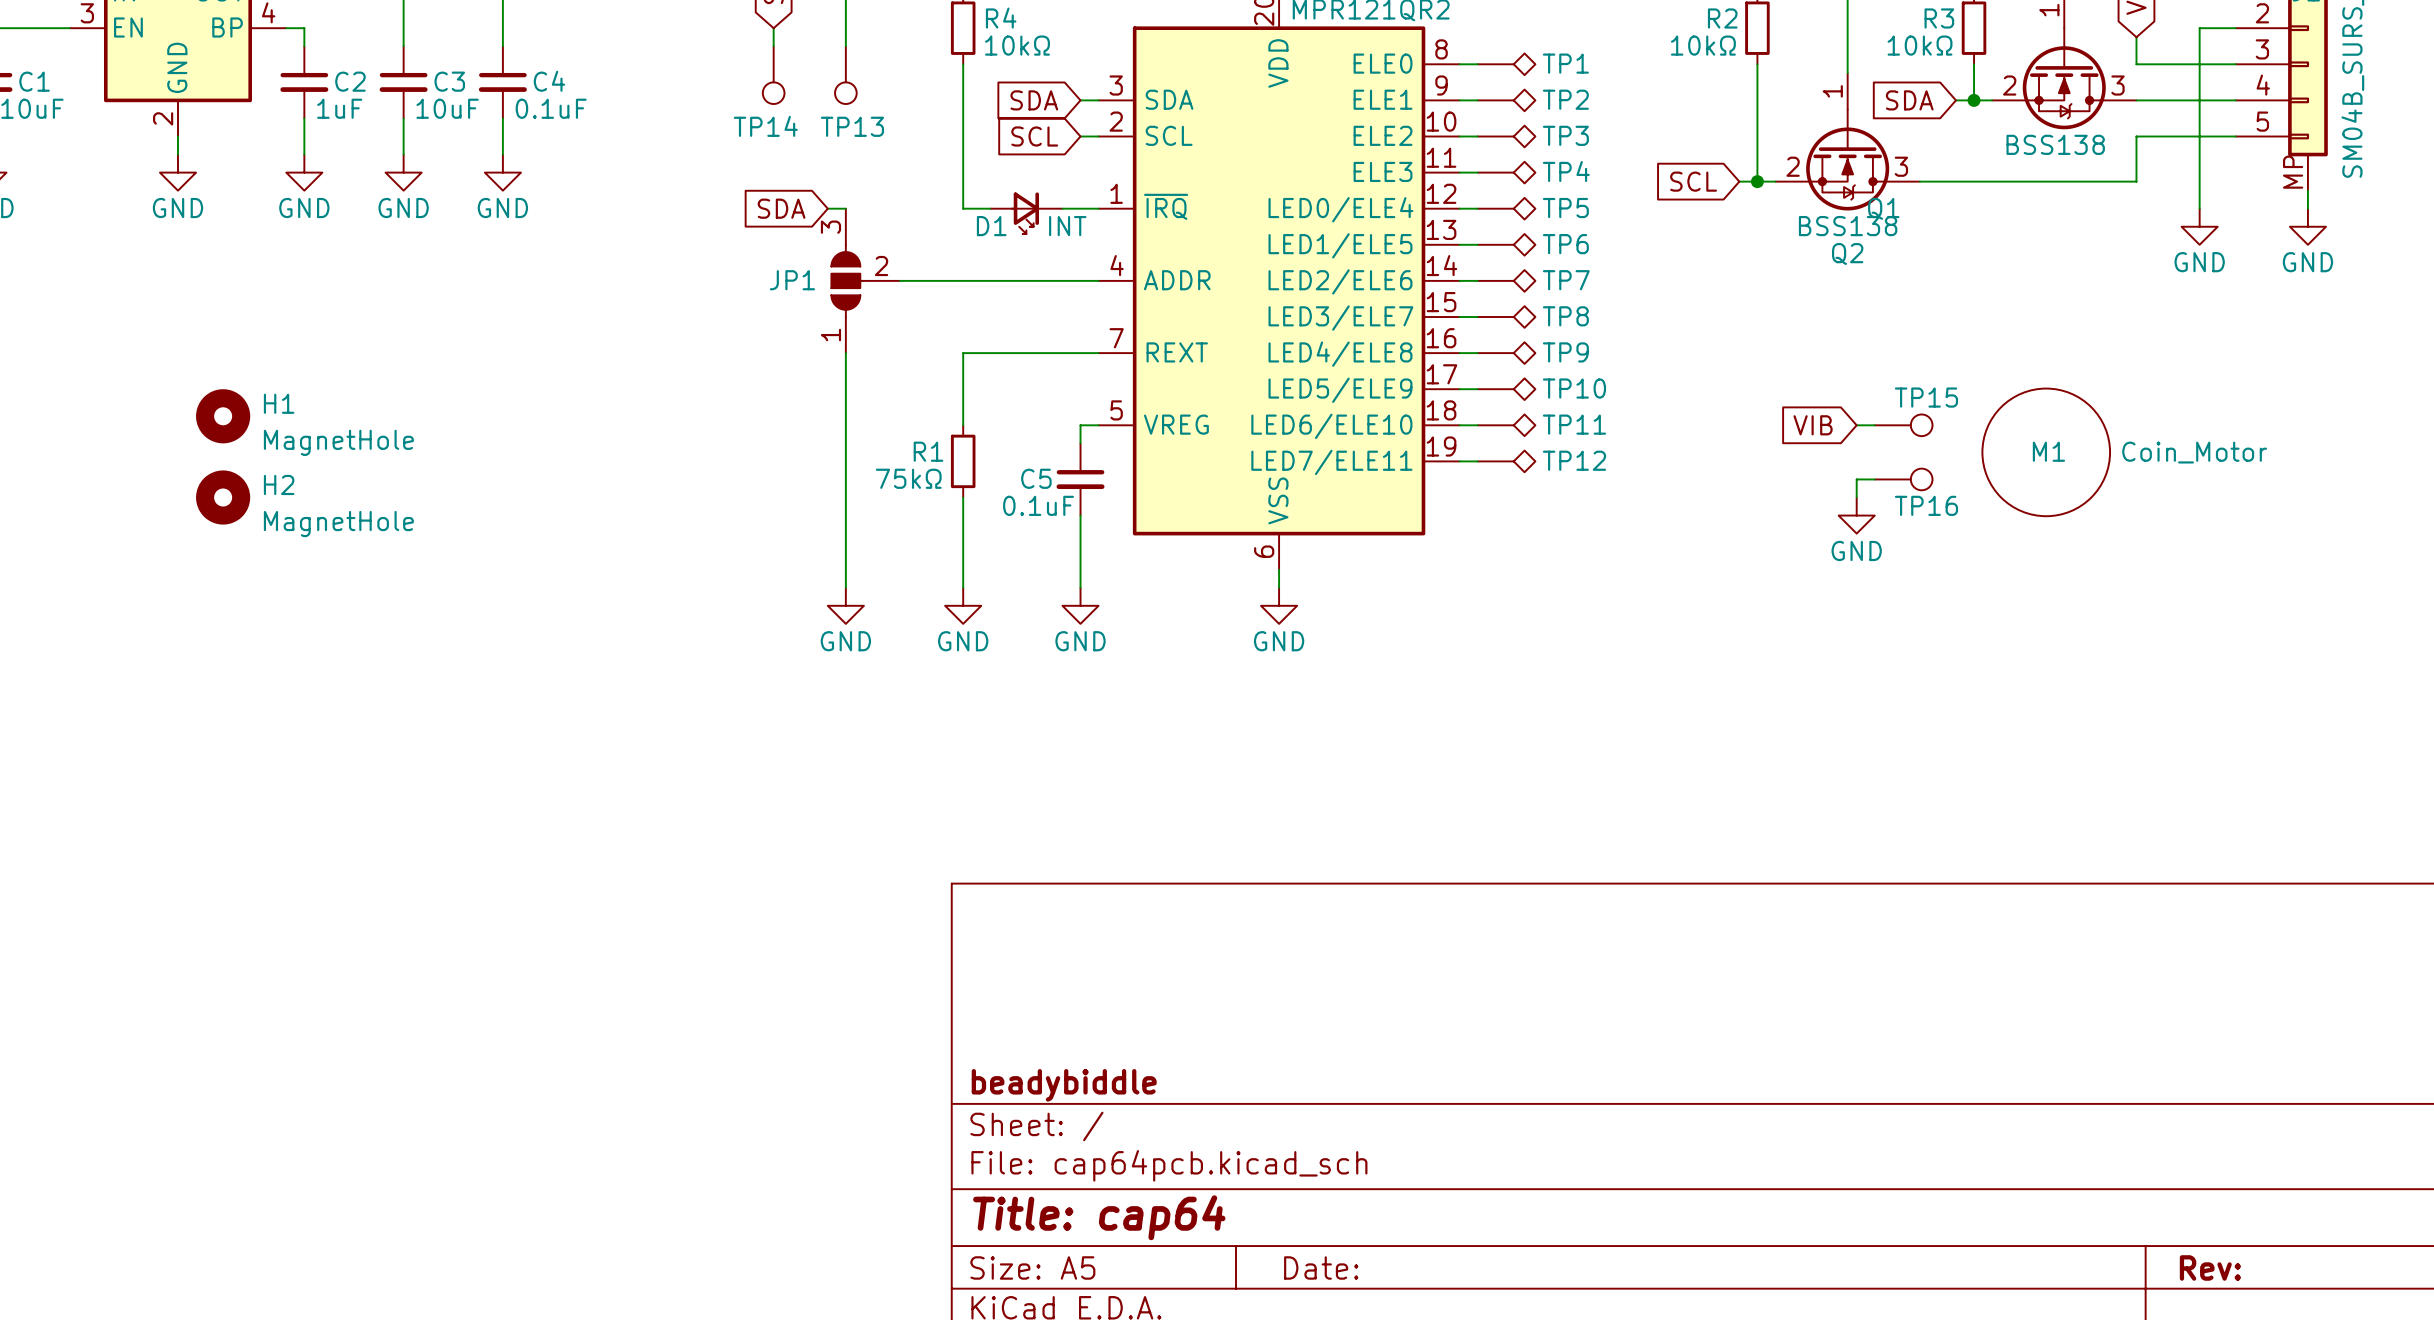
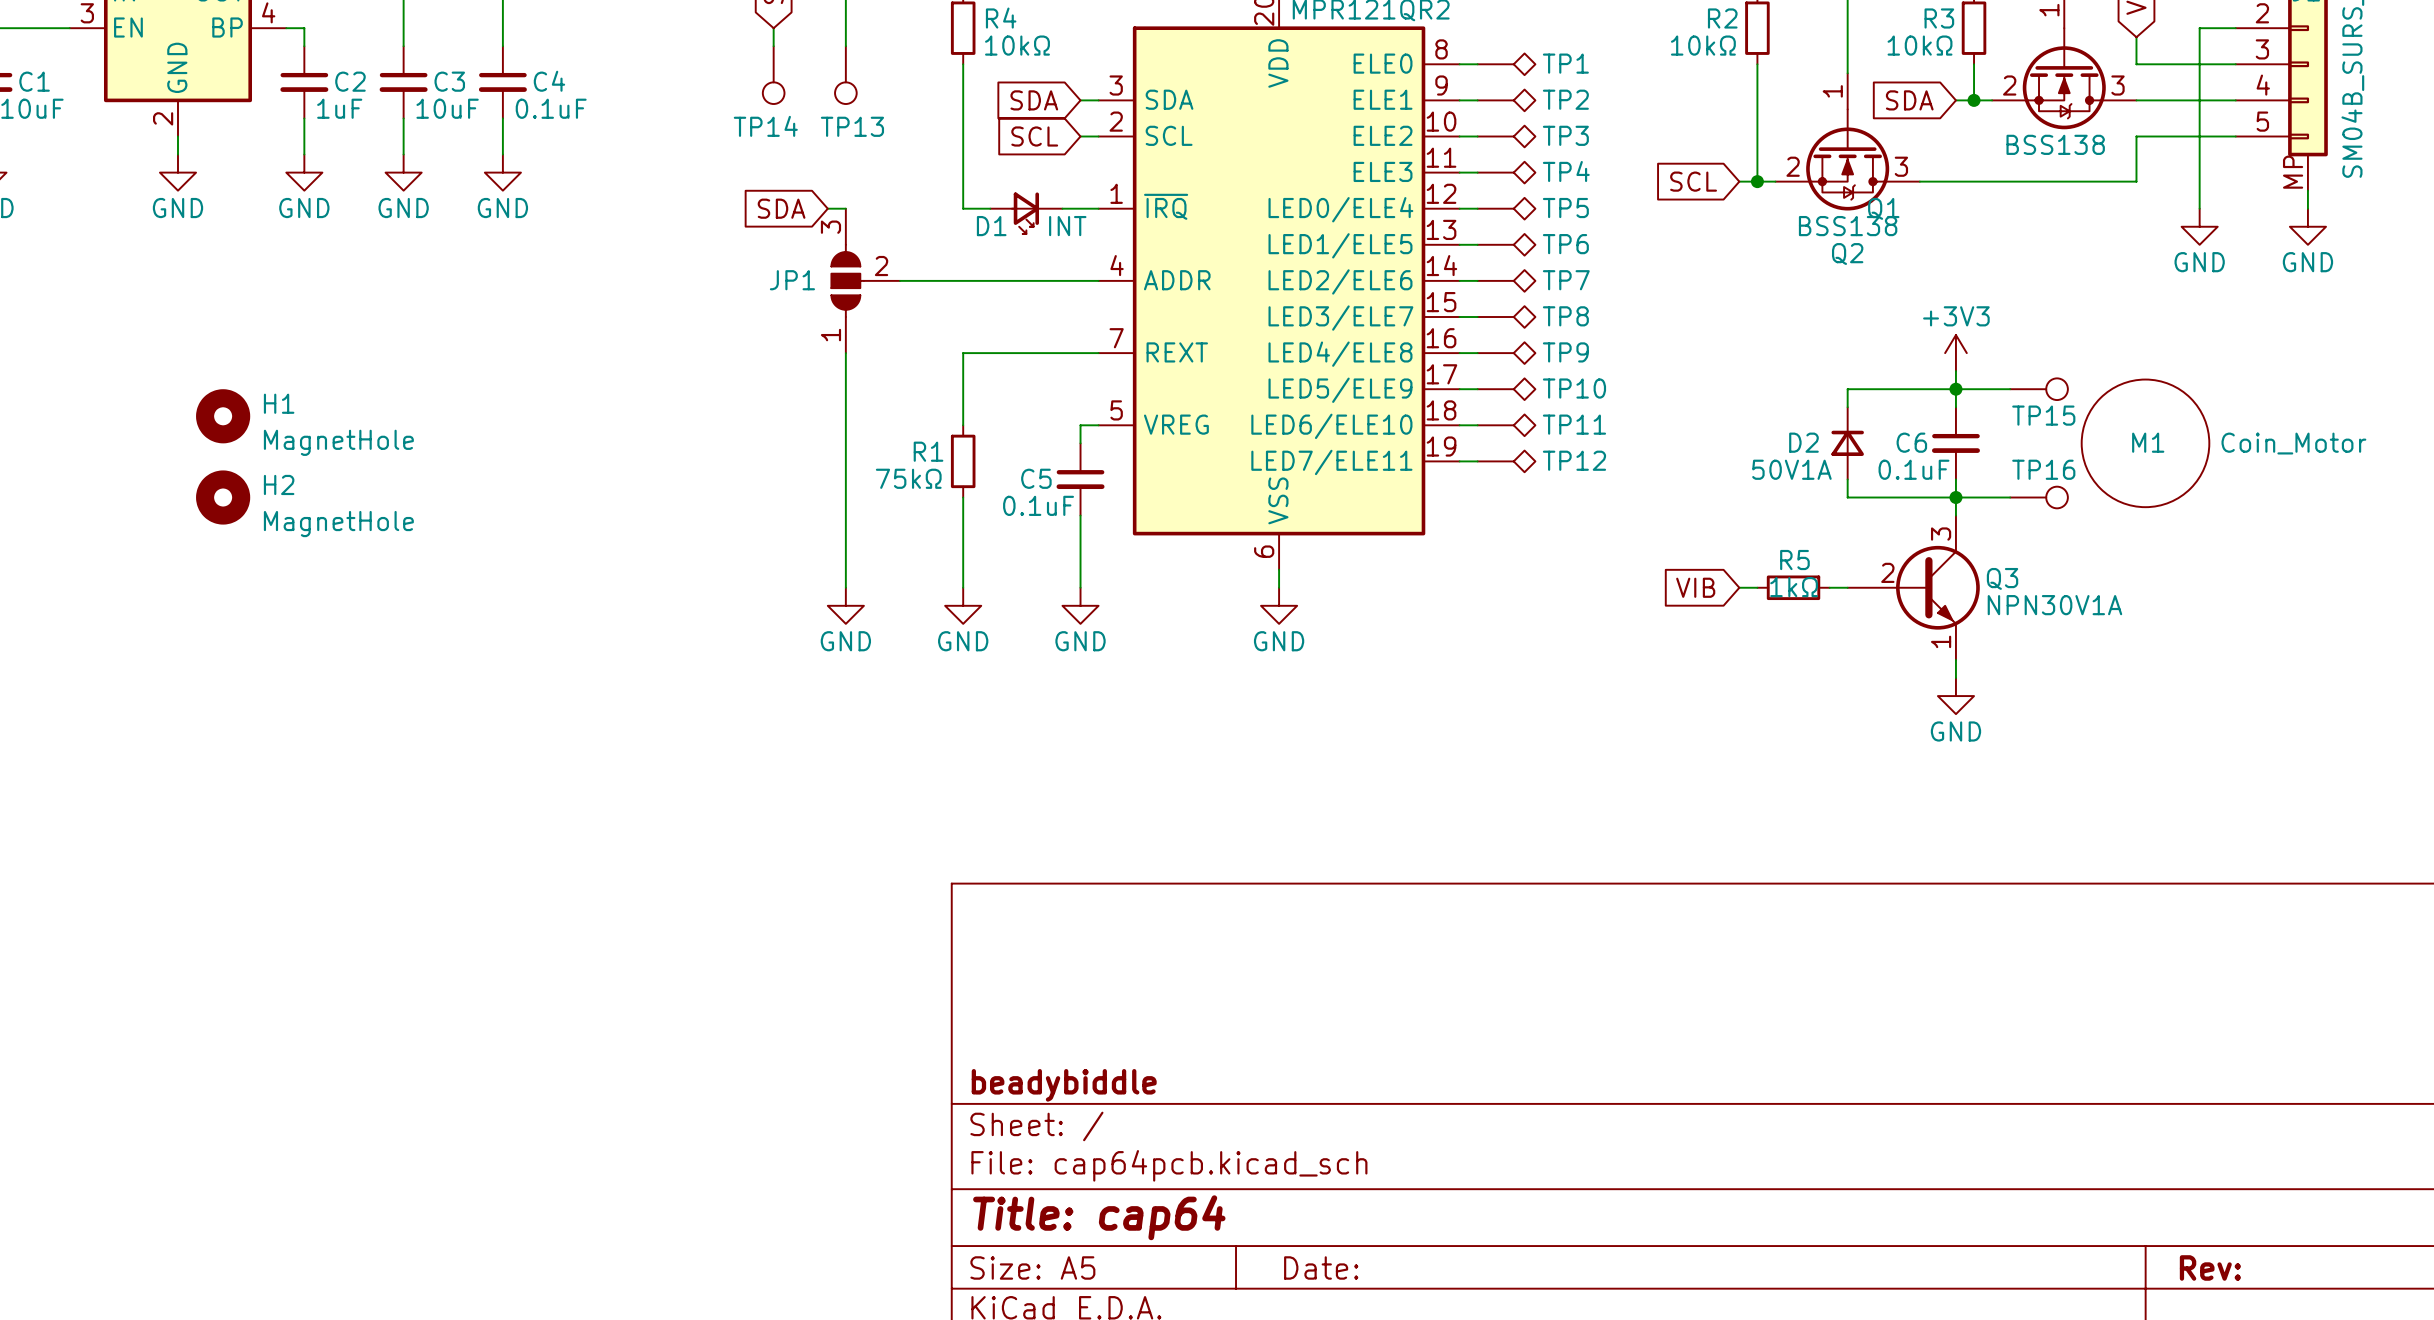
power symbol: none -> +3V3 (1955, 353)
wire: none -> (1955, 371) (1955, 407)
junction: none -> (1955, 389)
wire: none -> (2010, 389) (1847, 389) (1847, 407)
TP15 name position: TP15 (1926, 397) -> TP15 (2043, 415)
global label position: VIB (1813, 425) -> VIB (1695, 587)
wire: (1856, 425) (1874, 425) -> (1829, 587) (1847, 587)
TP15 position: (1903, 425) -> (2039, 389)
D2: none -> 50V1A (1847, 443)
C6: none -> 0.1uF (1955, 443)
M1 position: (2046, 452) -> (2145, 443)
wire: none -> (1847, 479) (1847, 497) (2010, 497)
wire: (1874, 479) (1856, 479) (1856, 497) -> none
TP16 position: (1903, 479) -> (2039, 497)
wire: none -> (1955, 479) (1955, 515)
junction: none -> (1955, 497)
TP16 name position: TP16 (1926, 505) -> TP16 (2043, 469)
power symbol position: GND (1856, 515) -> GND (1955, 696)
wire: none -> (1739, 587) (1757, 587)
R5: none -> 1kΩ (1793, 587)
Q3: none -> NPN30V1A (1913, 587)
wire: none -> (1955, 659) (1955, 678)

